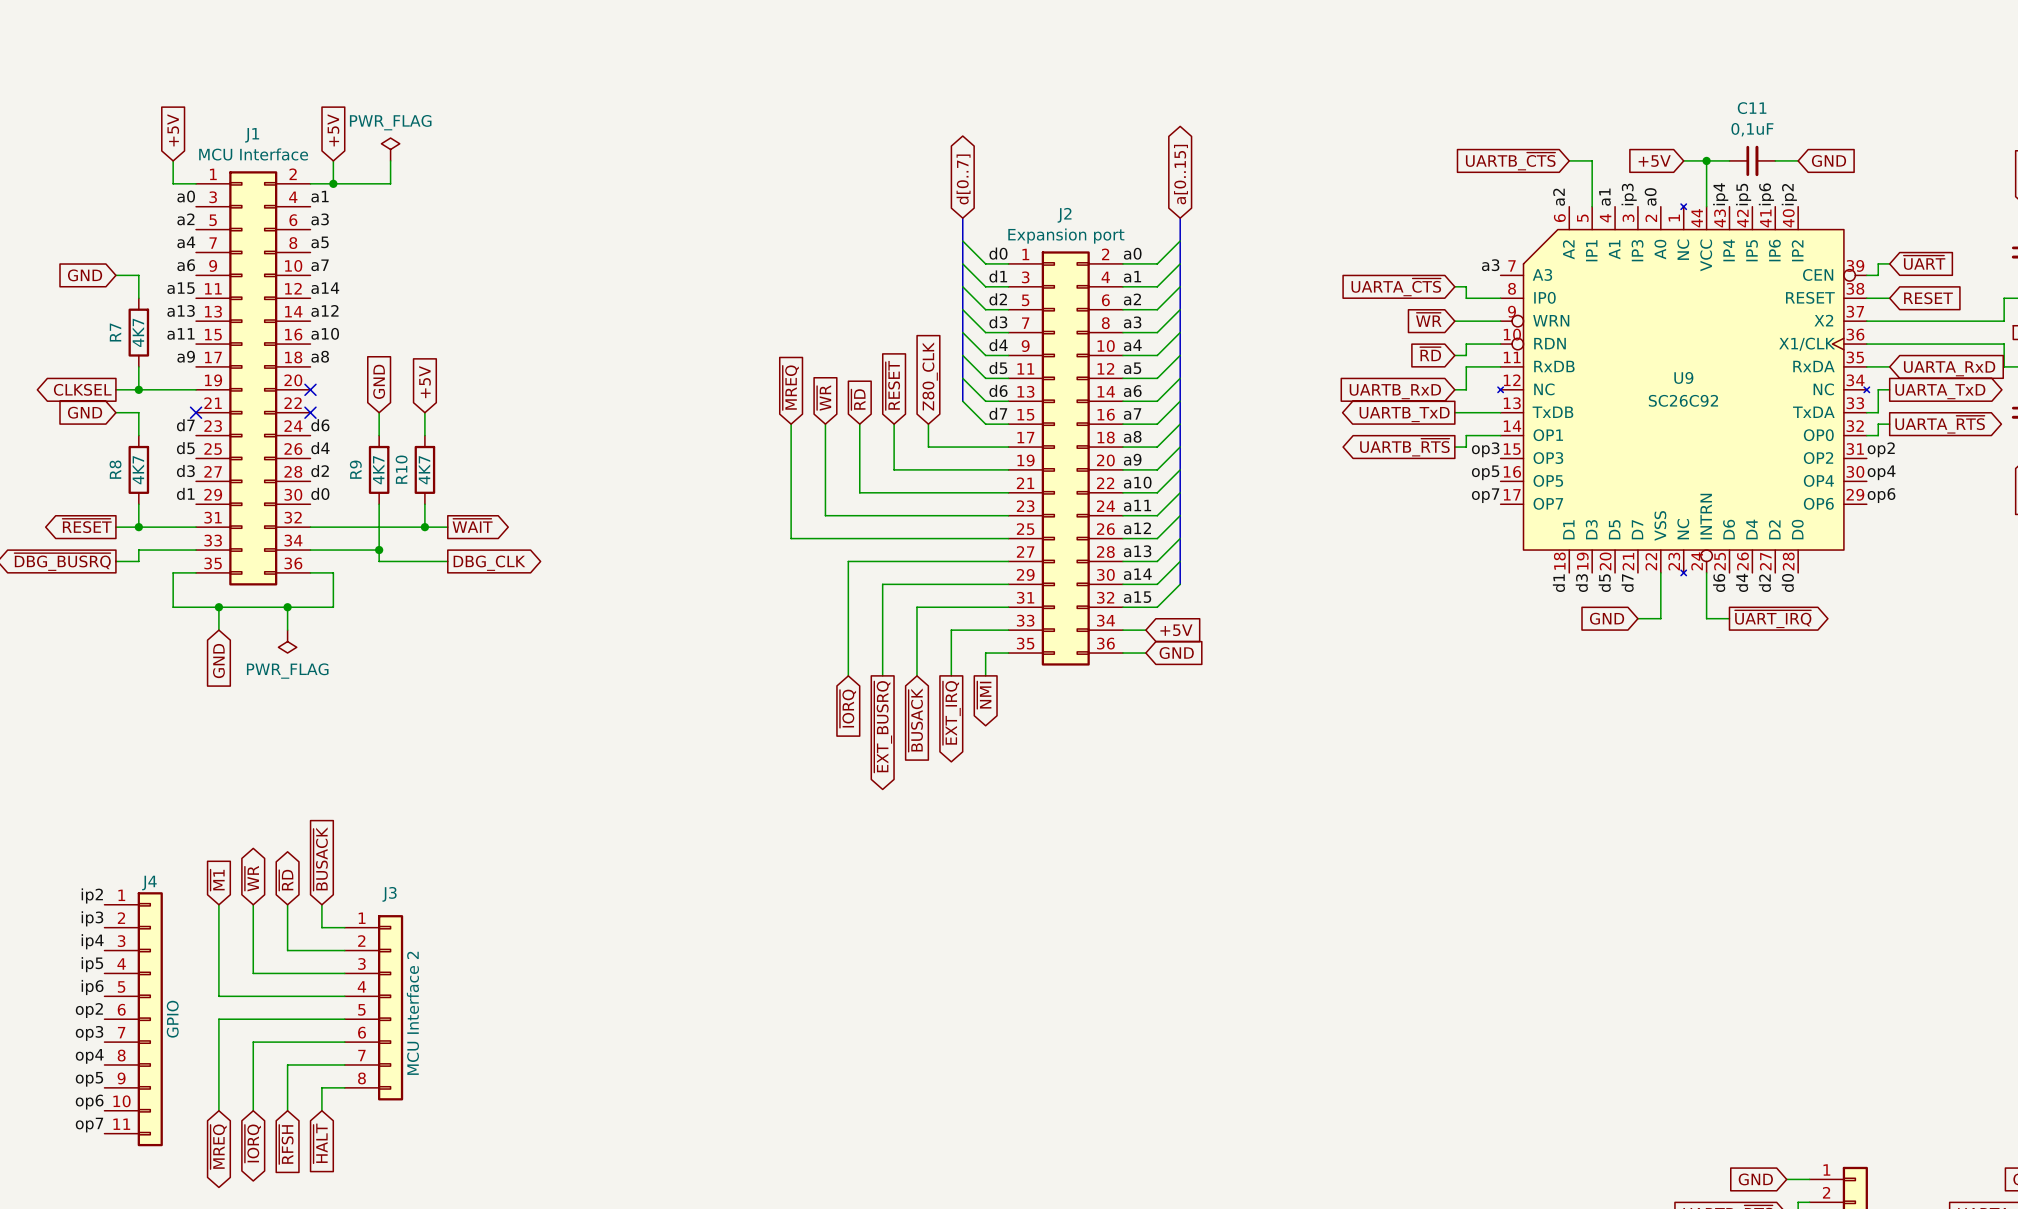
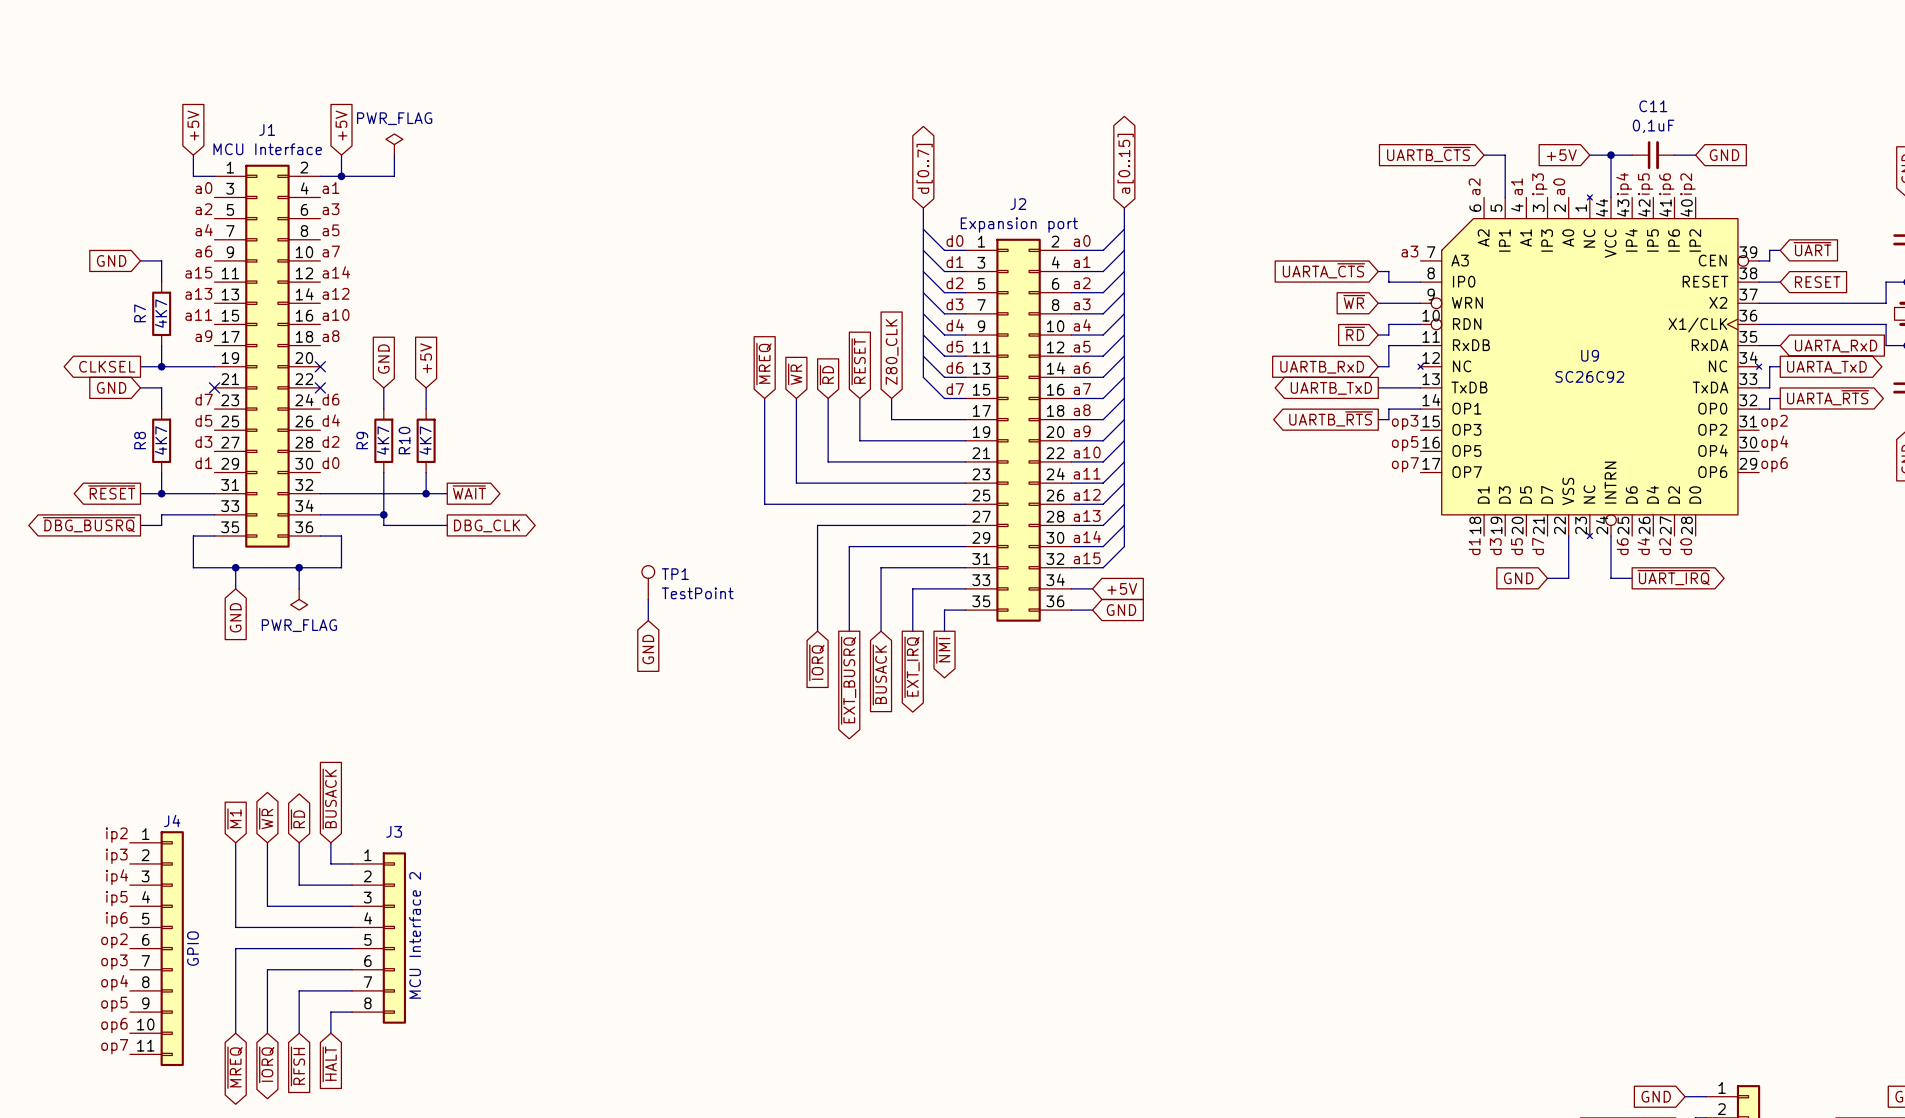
TP1: none -> TestPoint (648, 582)
wire: none -> (648, 599) (648, 620)
global label: none -> GND (648, 649)

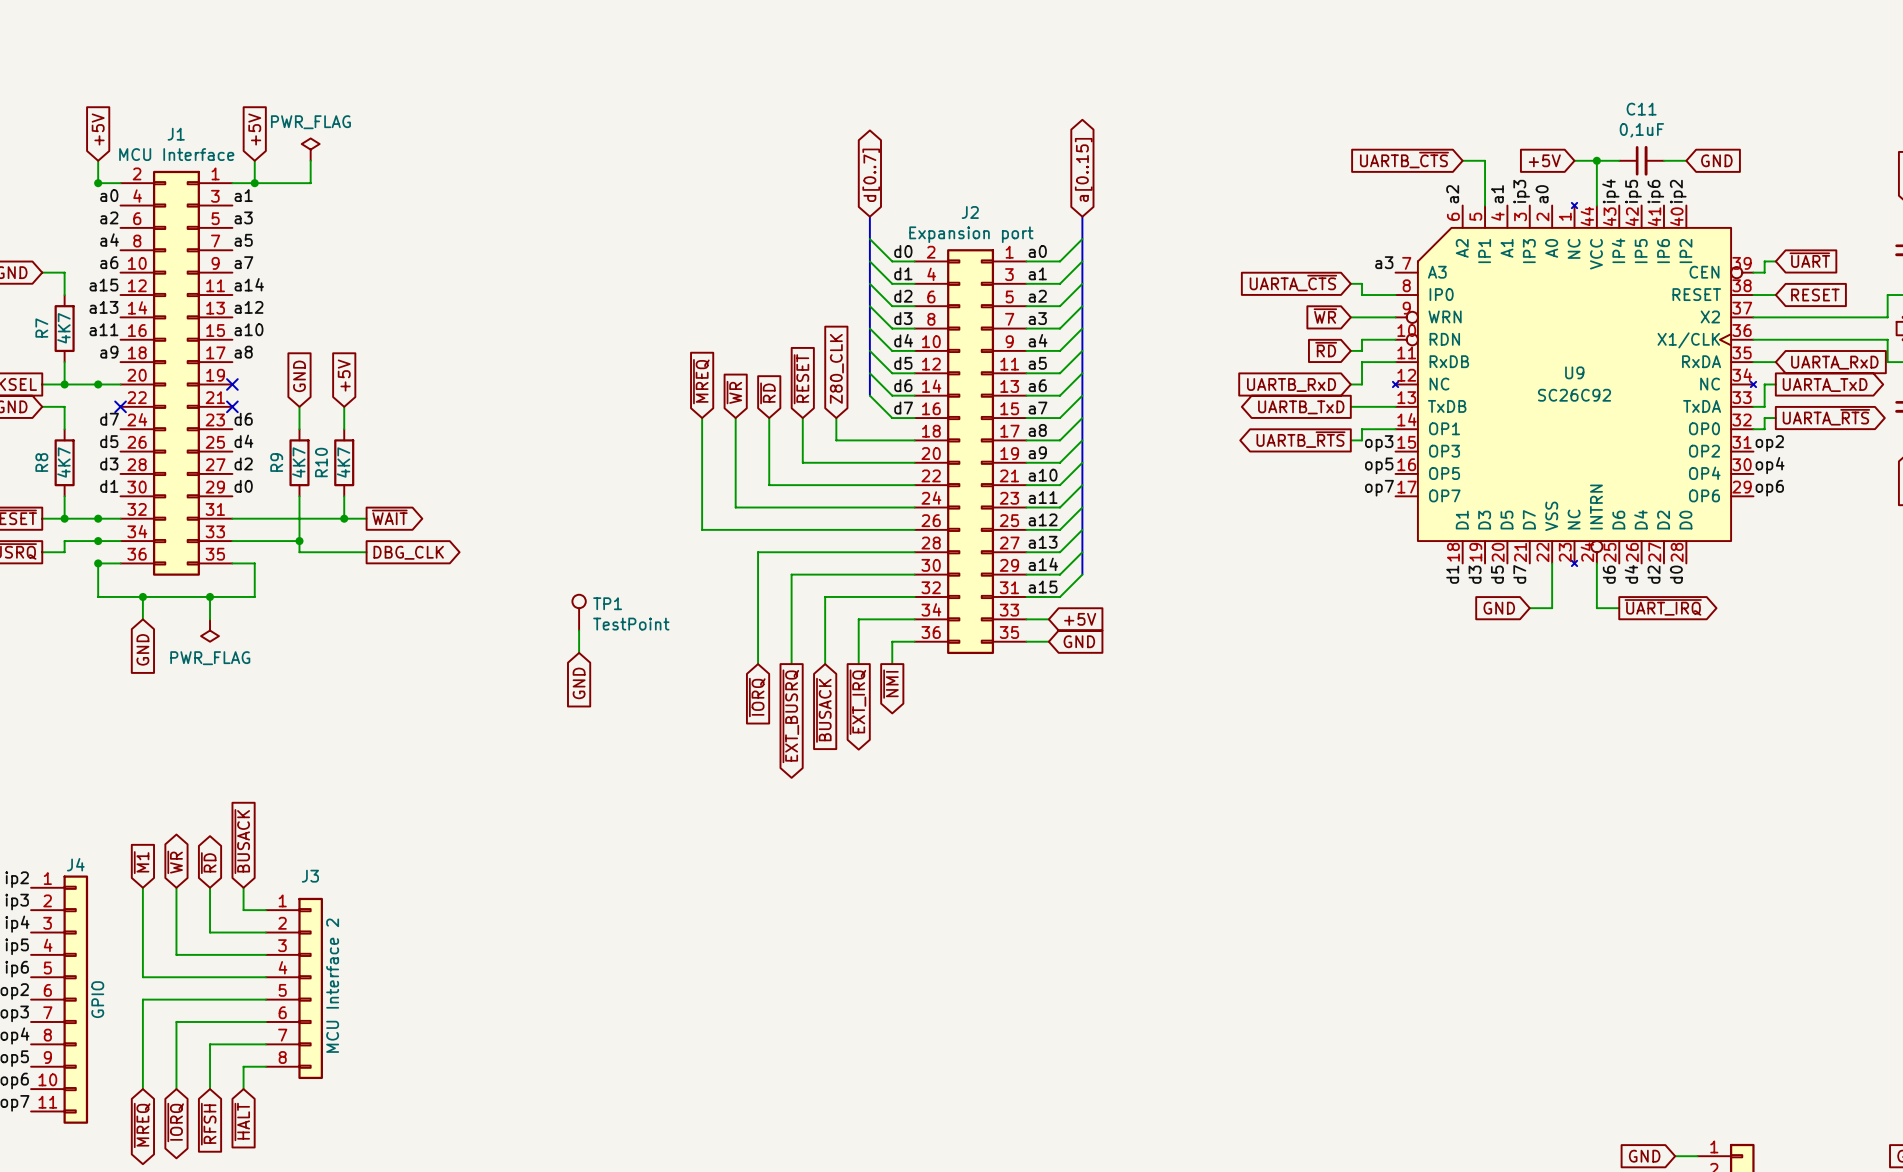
junction: none -> (98, 183)
J1 flip: as is (267, 356) -> left-right (176, 373)
junction: none -> (98, 384)
J2 flip: as is (1018, 430) -> left-right (970, 451)
junction: none -> (98, 518)
junction: none -> (98, 541)
junction: none -> (98, 563)

